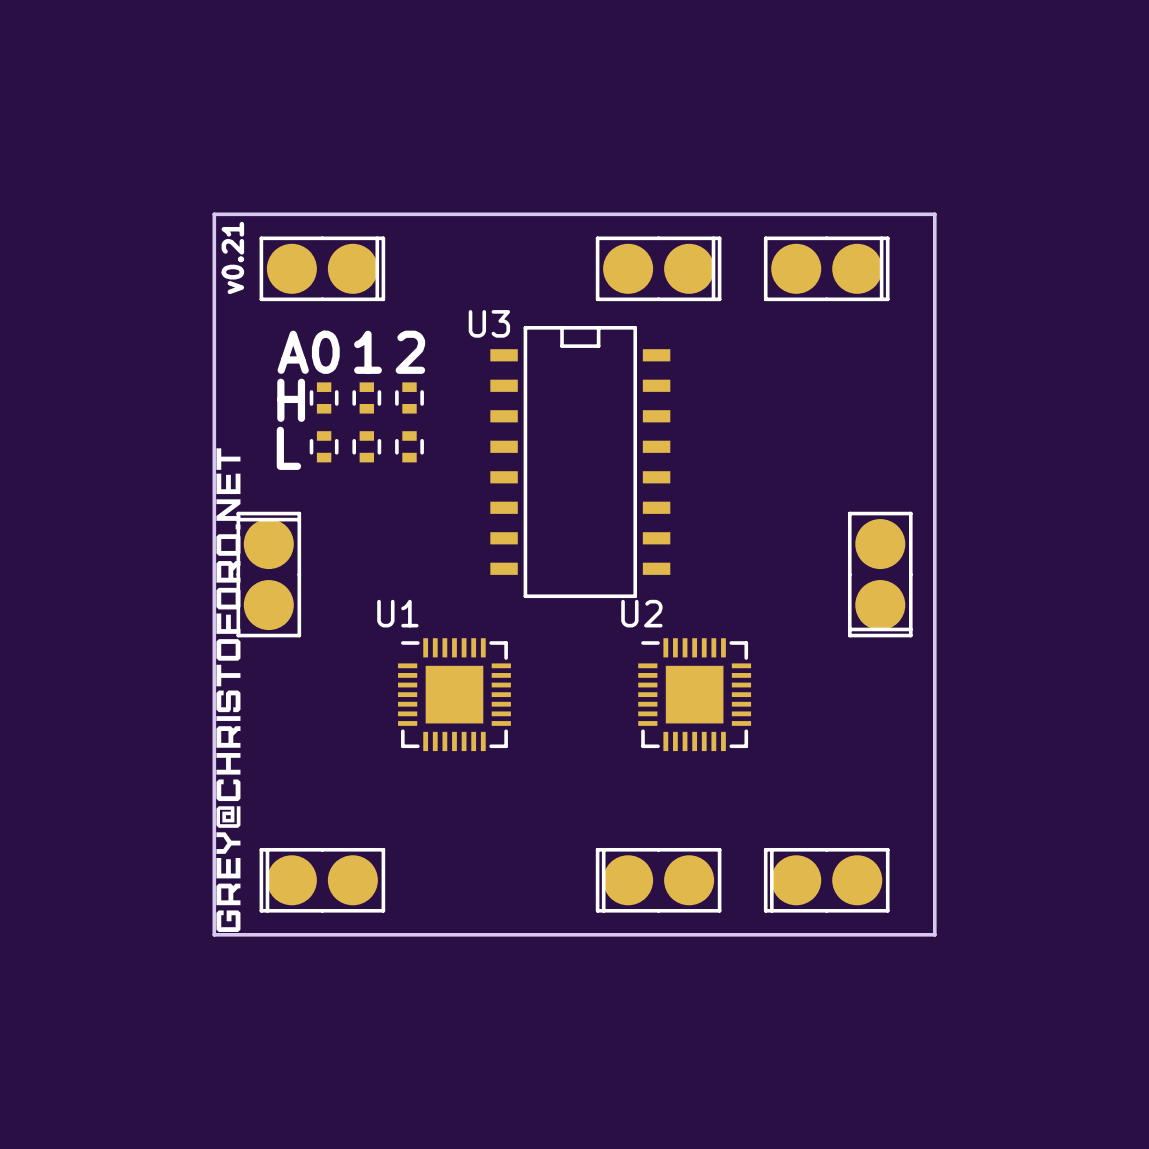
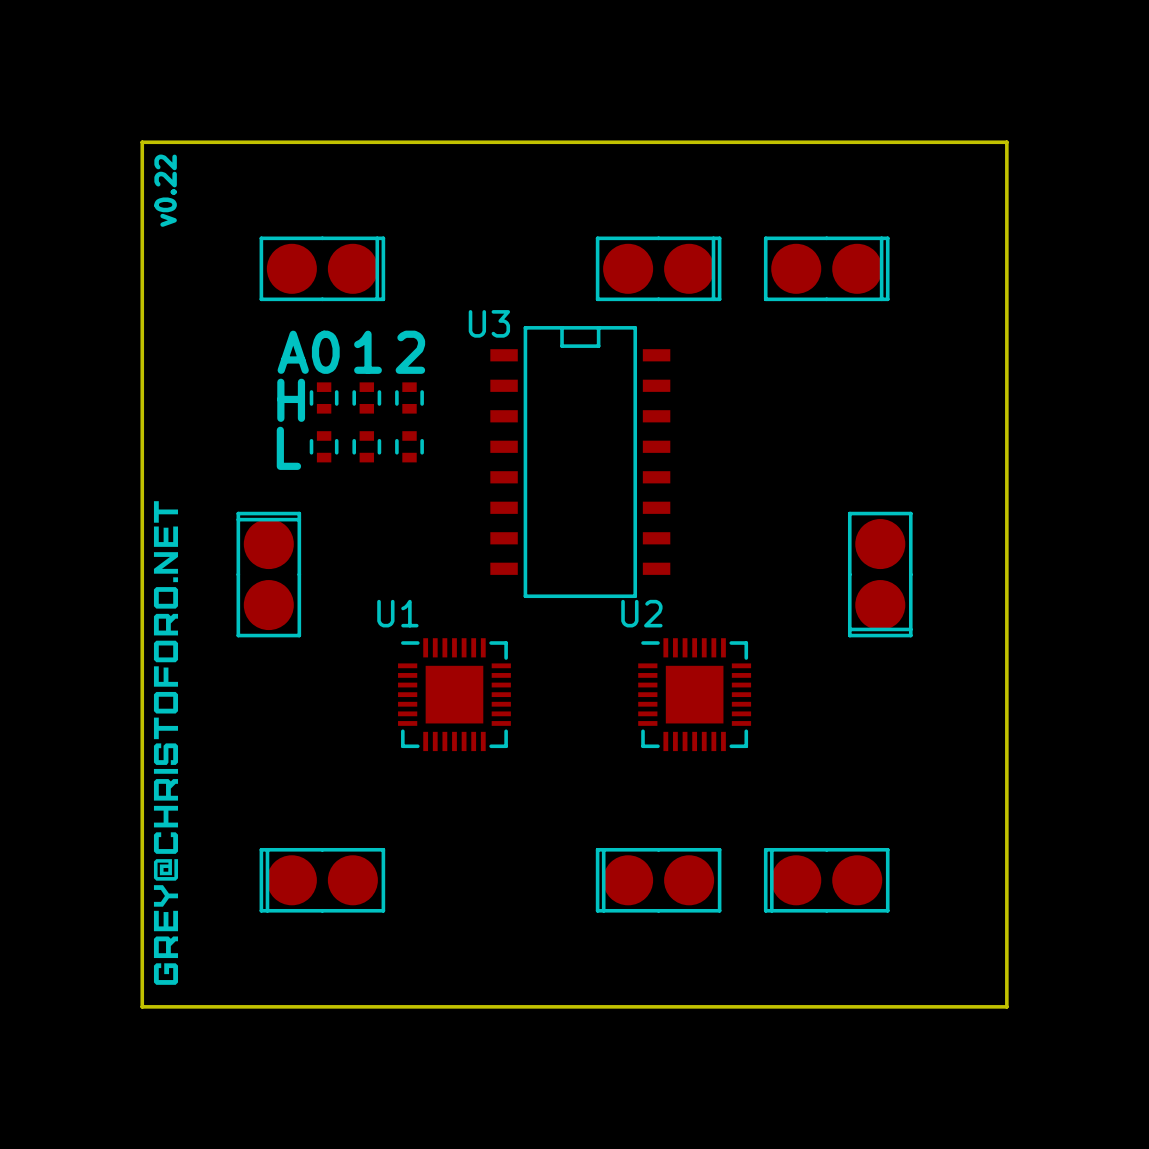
text: none -> v0.22 (165, 190)
board edge: (214, 214) (934, 214) (934, 934) (214, 934) (214, 214) -> (142, 142) (142, 1006) (1006, 1006) (1006, 142) (142, 142)
text: v0.21 (232, 257) -> none
drawing position: (228, 690) -> (165, 743)

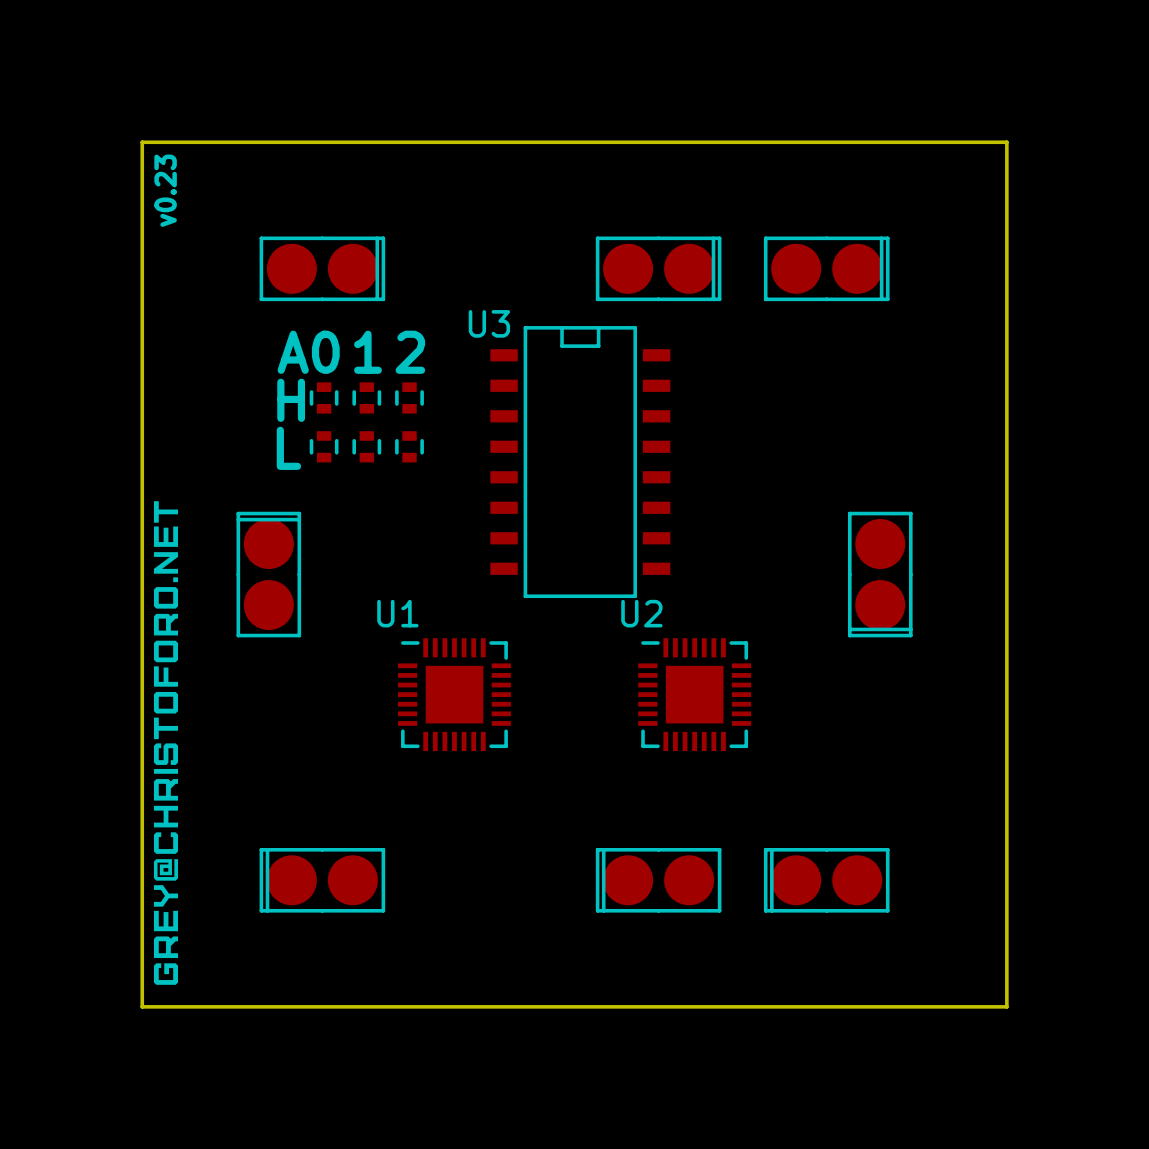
text: v0.22 (165, 190) -> v0.23 (165, 190)

